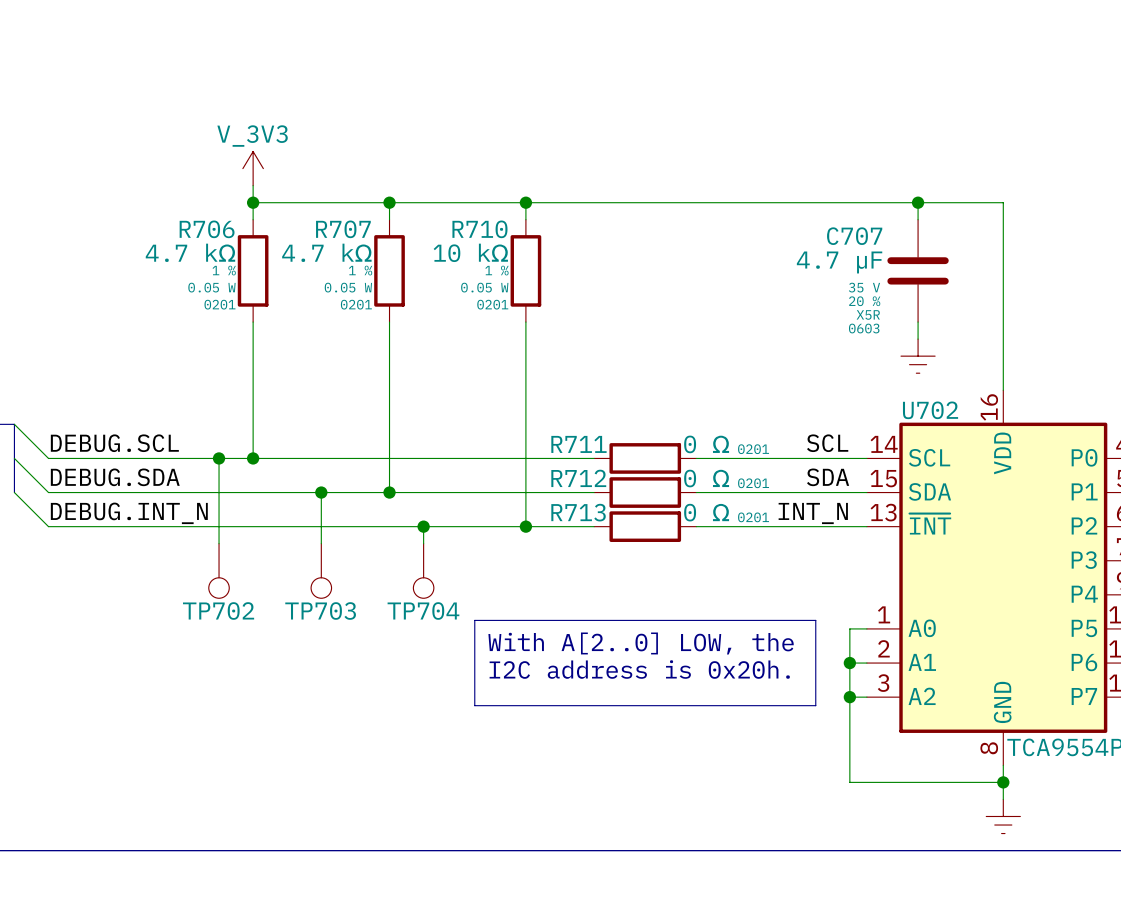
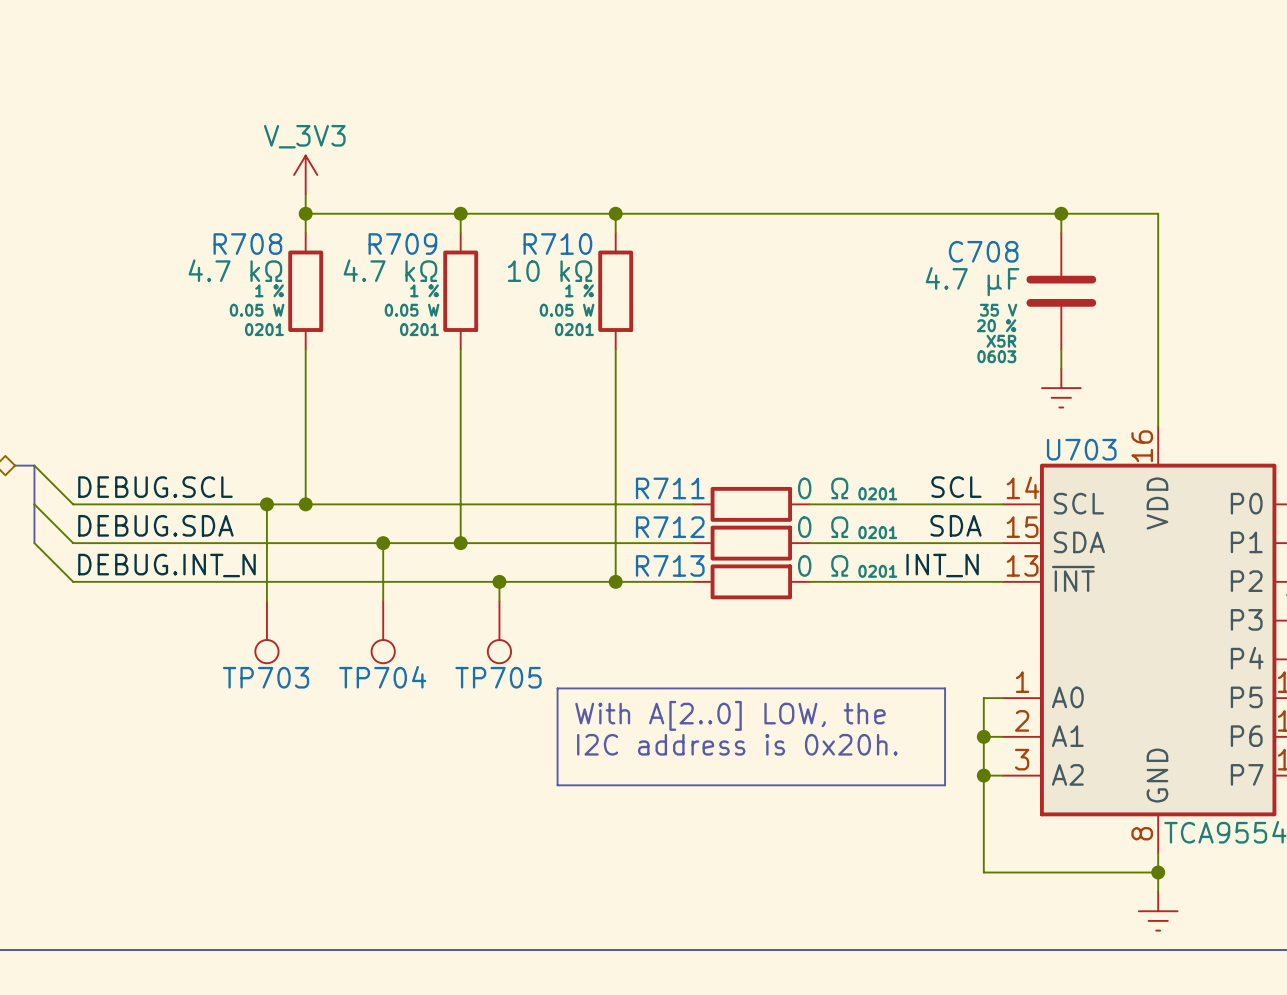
R706 name: R706 (207, 229) -> R708 (247, 244)
R707 name: R707 (343, 229) -> R709 (402, 244)
C707 name: C707 (854, 236) -> C708 (983, 251)
U702 name: U702 (930, 410) -> U703 (1081, 449)
TP702 name: TP702 (218, 611) -> TP703 (266, 677)
TP703 name: TP703 (320, 611) -> TP704 (382, 677)
TP704 name: TP704 (423, 611) -> TP705 (498, 677)

